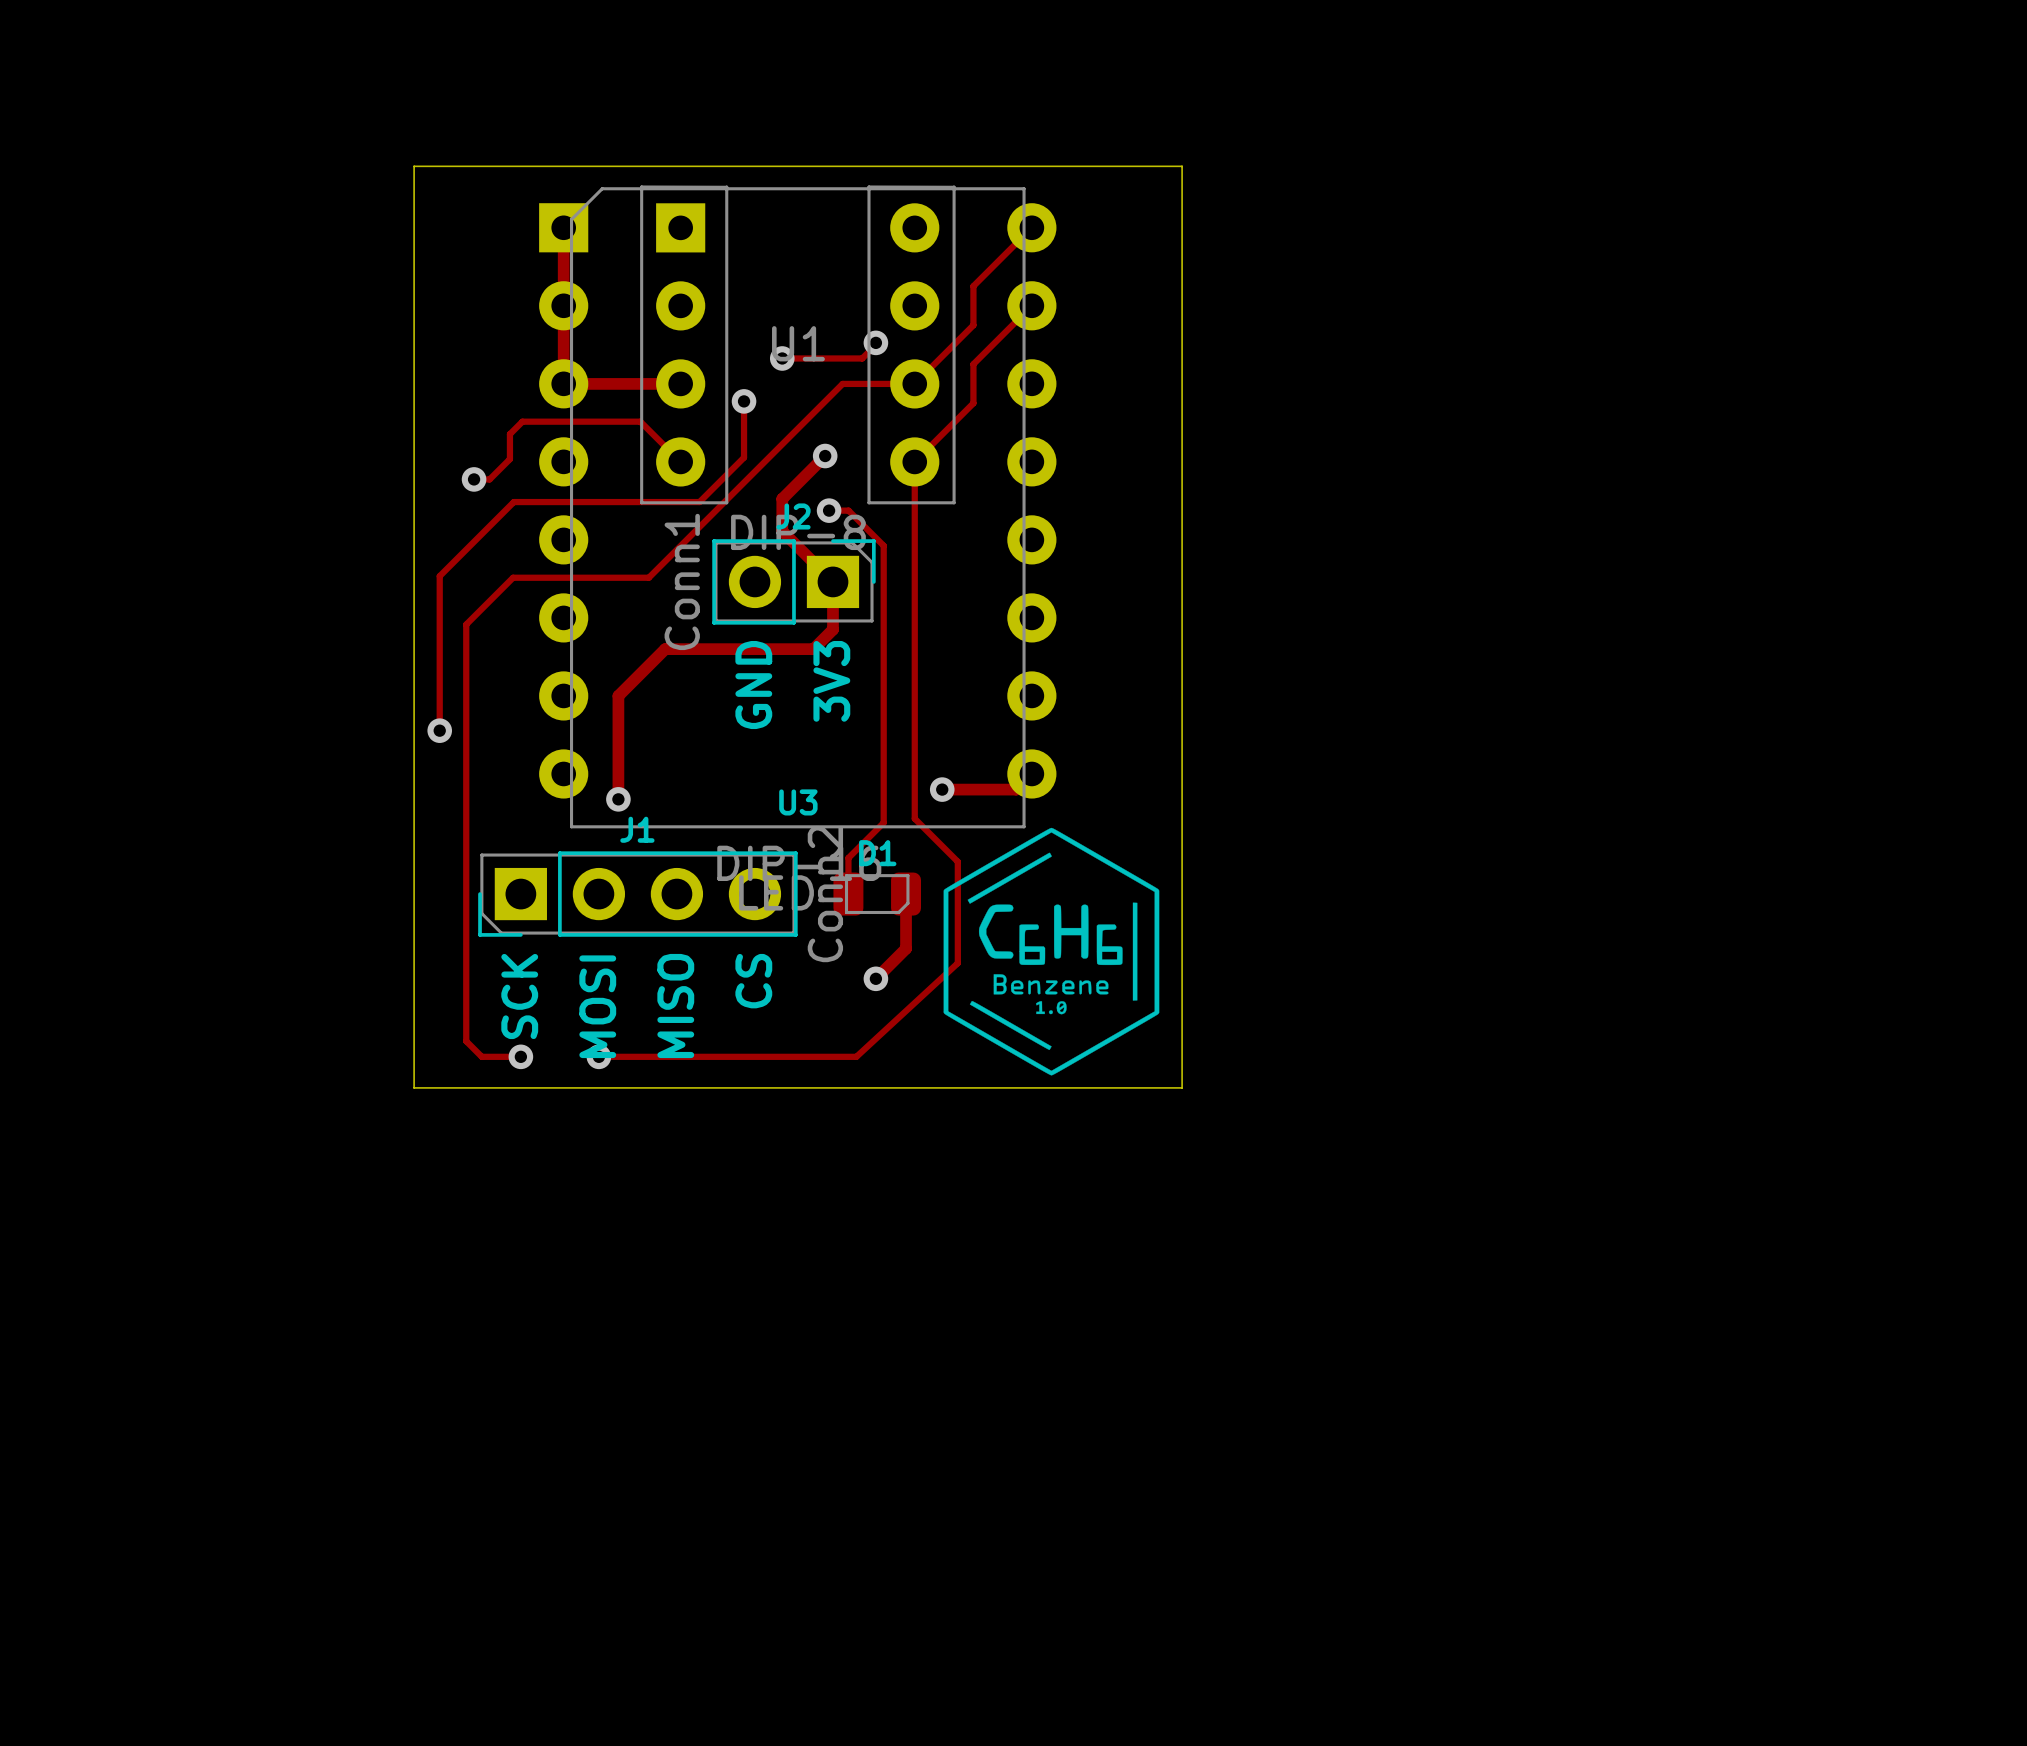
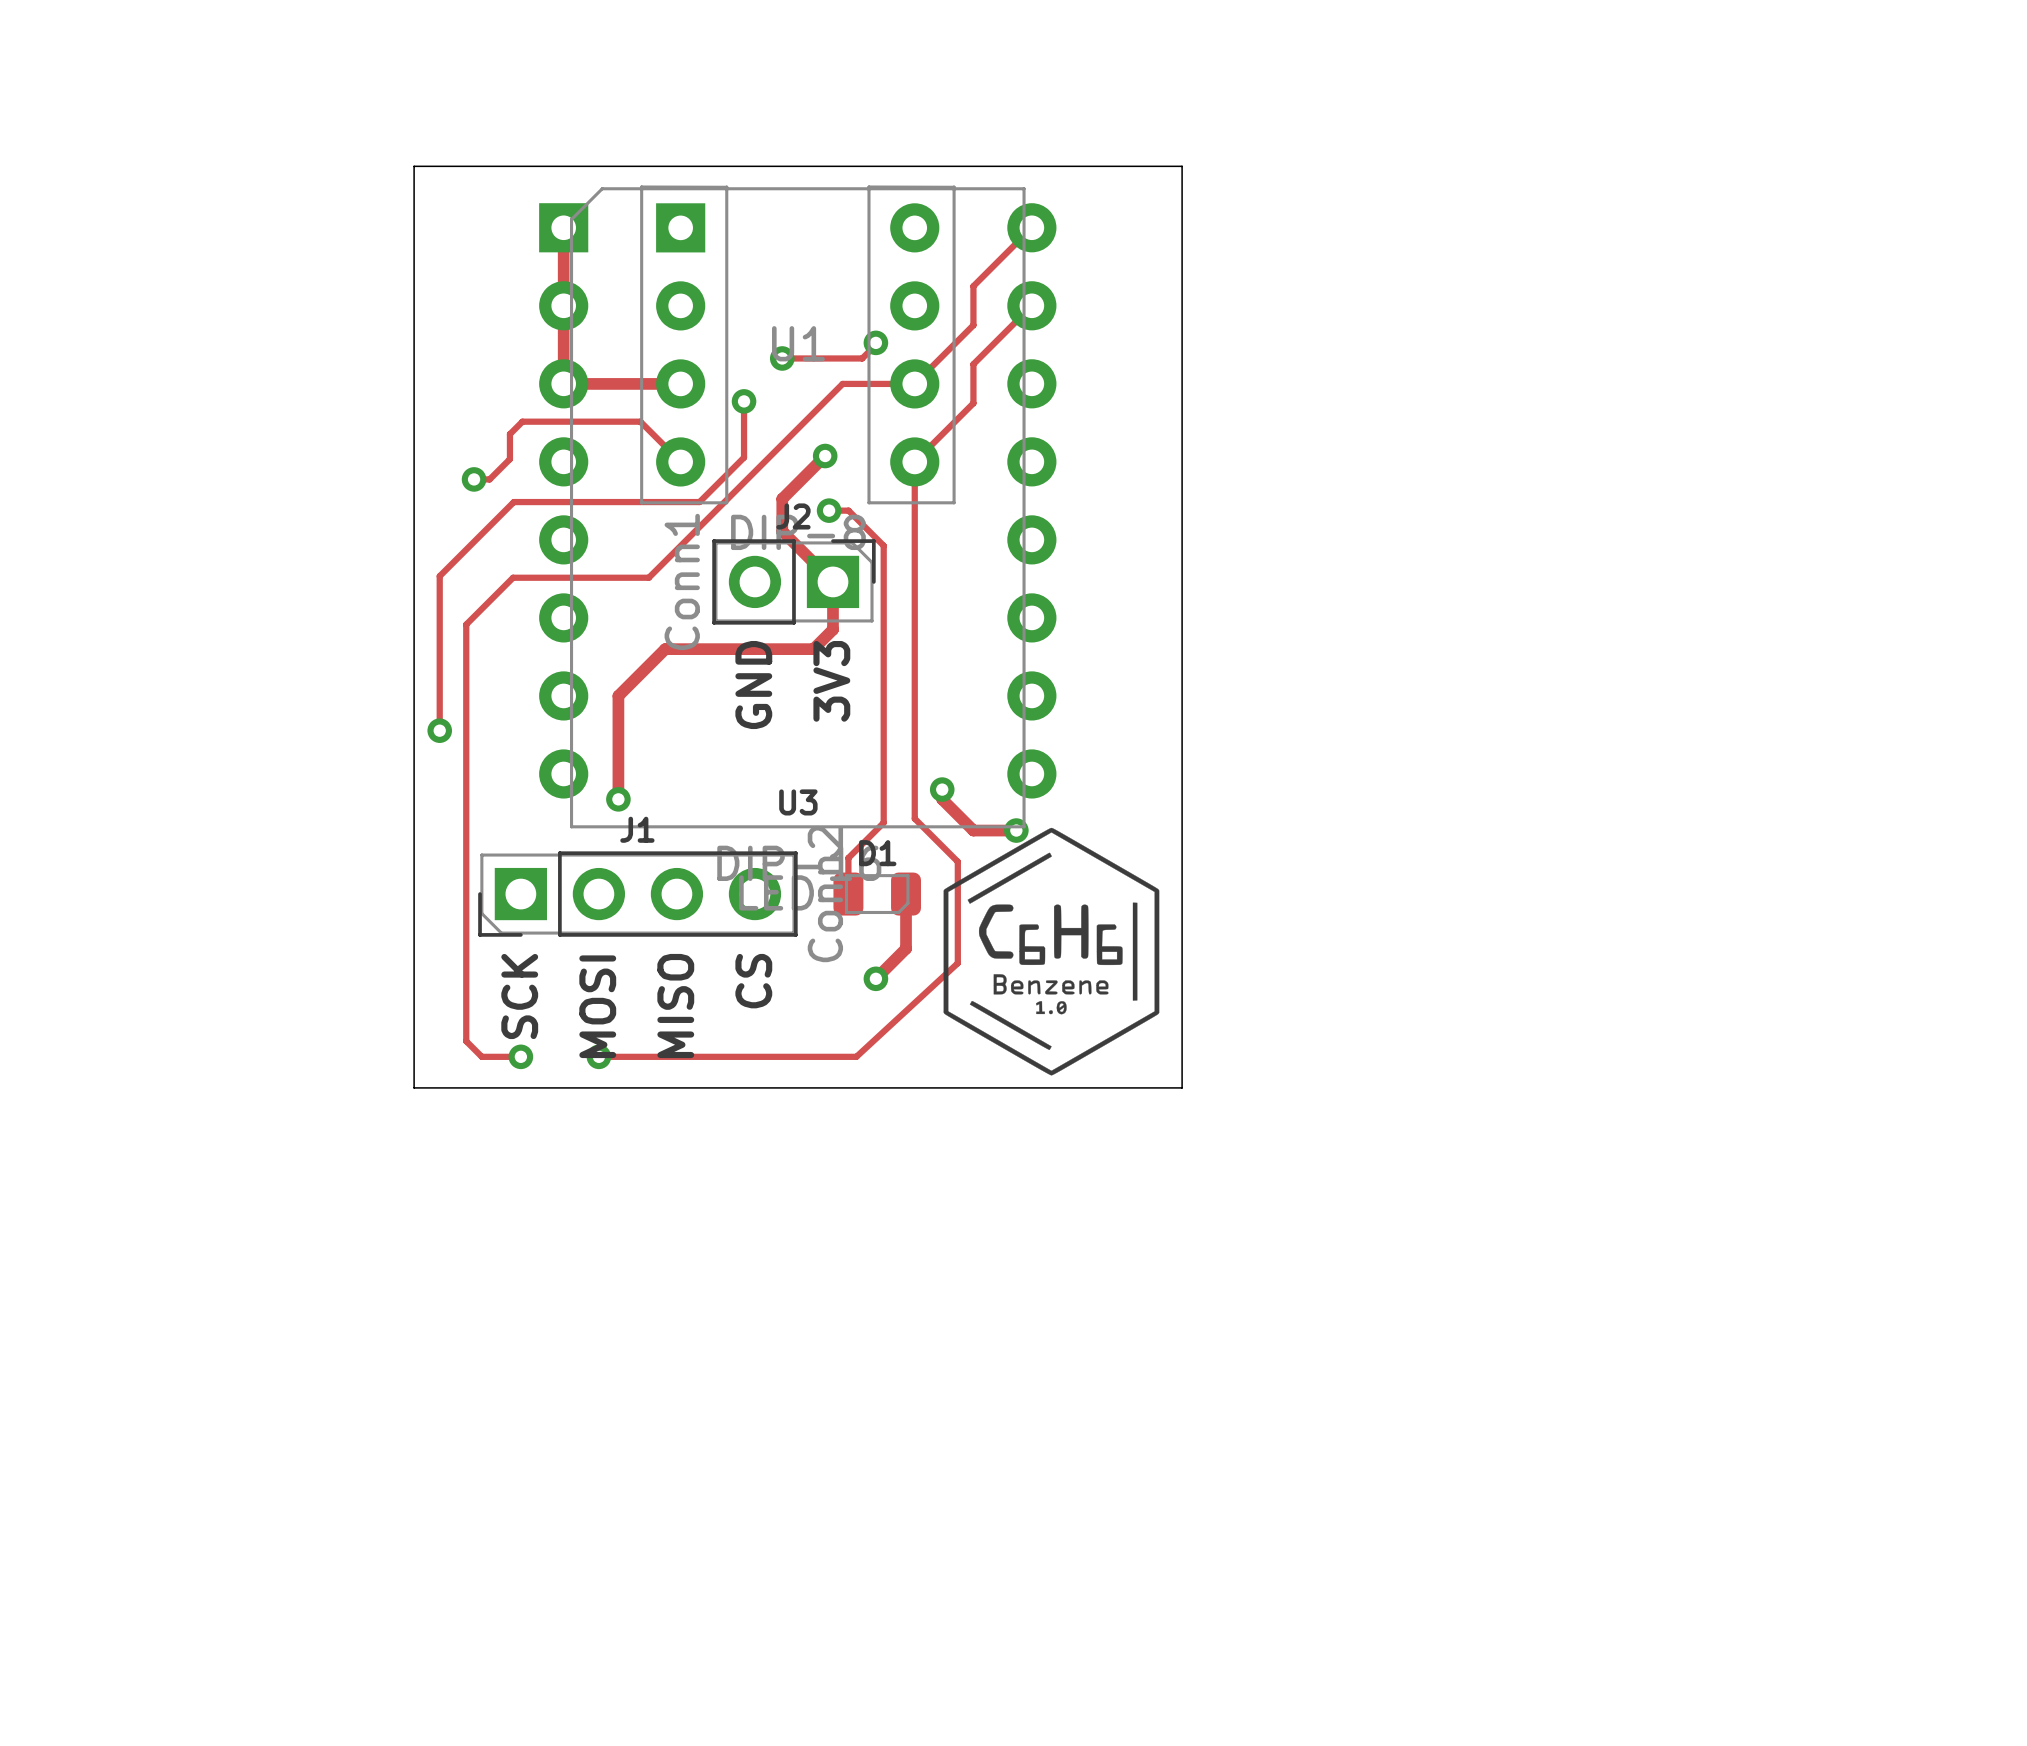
track: (1031, 773) (1016, 789) (942, 789) -> (1016, 830) (973, 830) (942, 799) (942, 789)
via: none -> (1016, 830)

